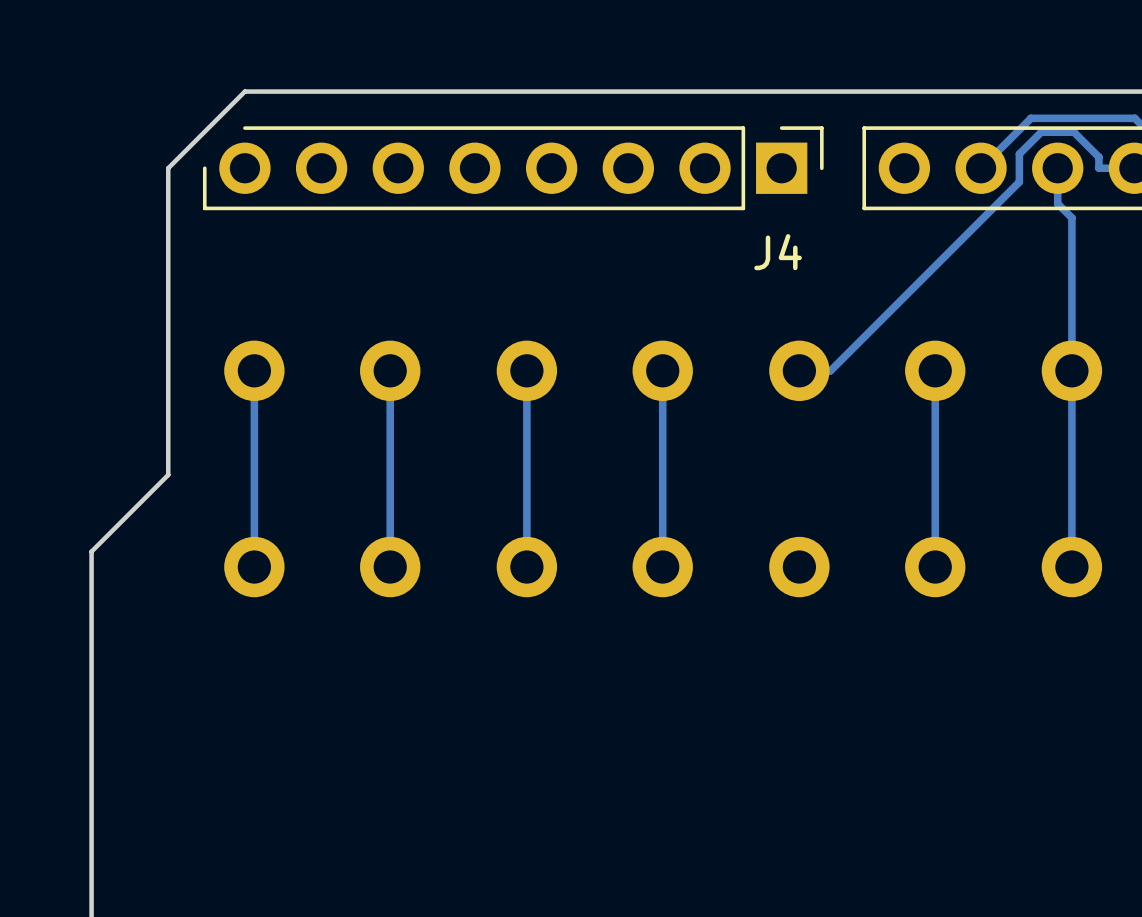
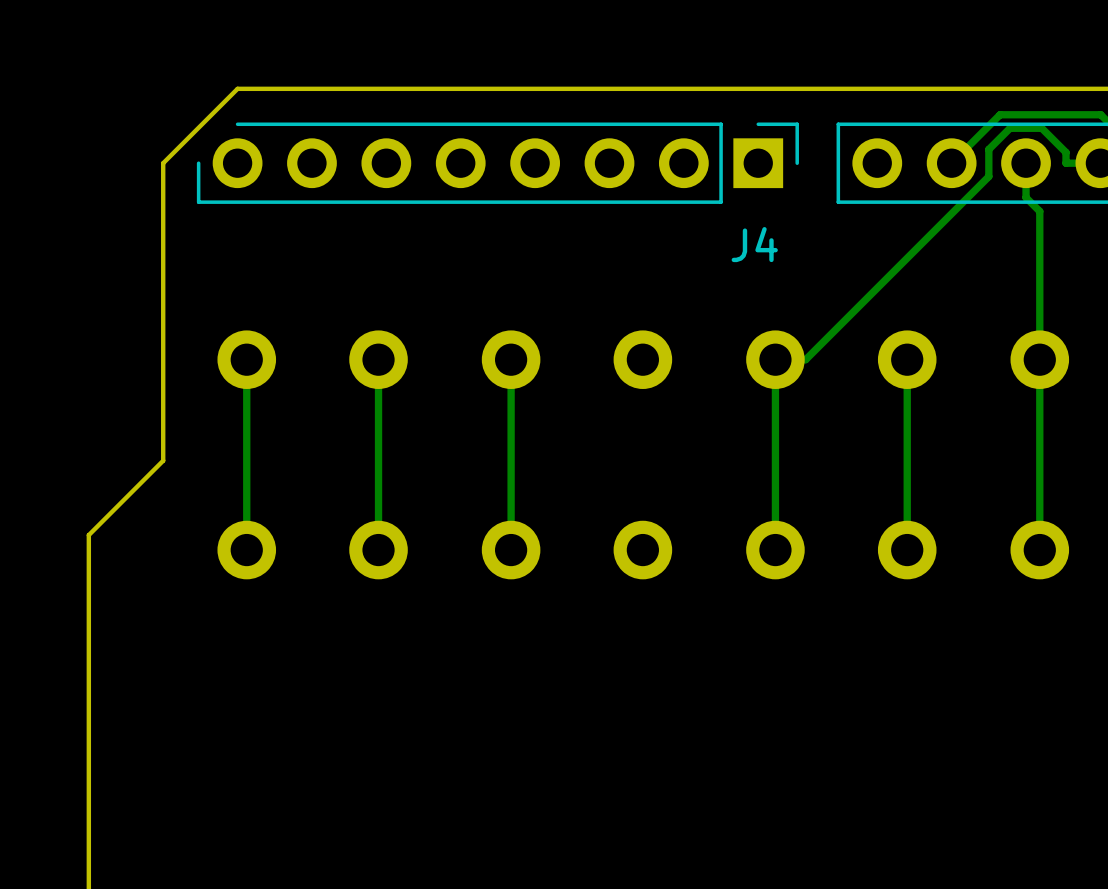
track: (662, 370) (662, 567) -> (775, 359) (775, 550)

